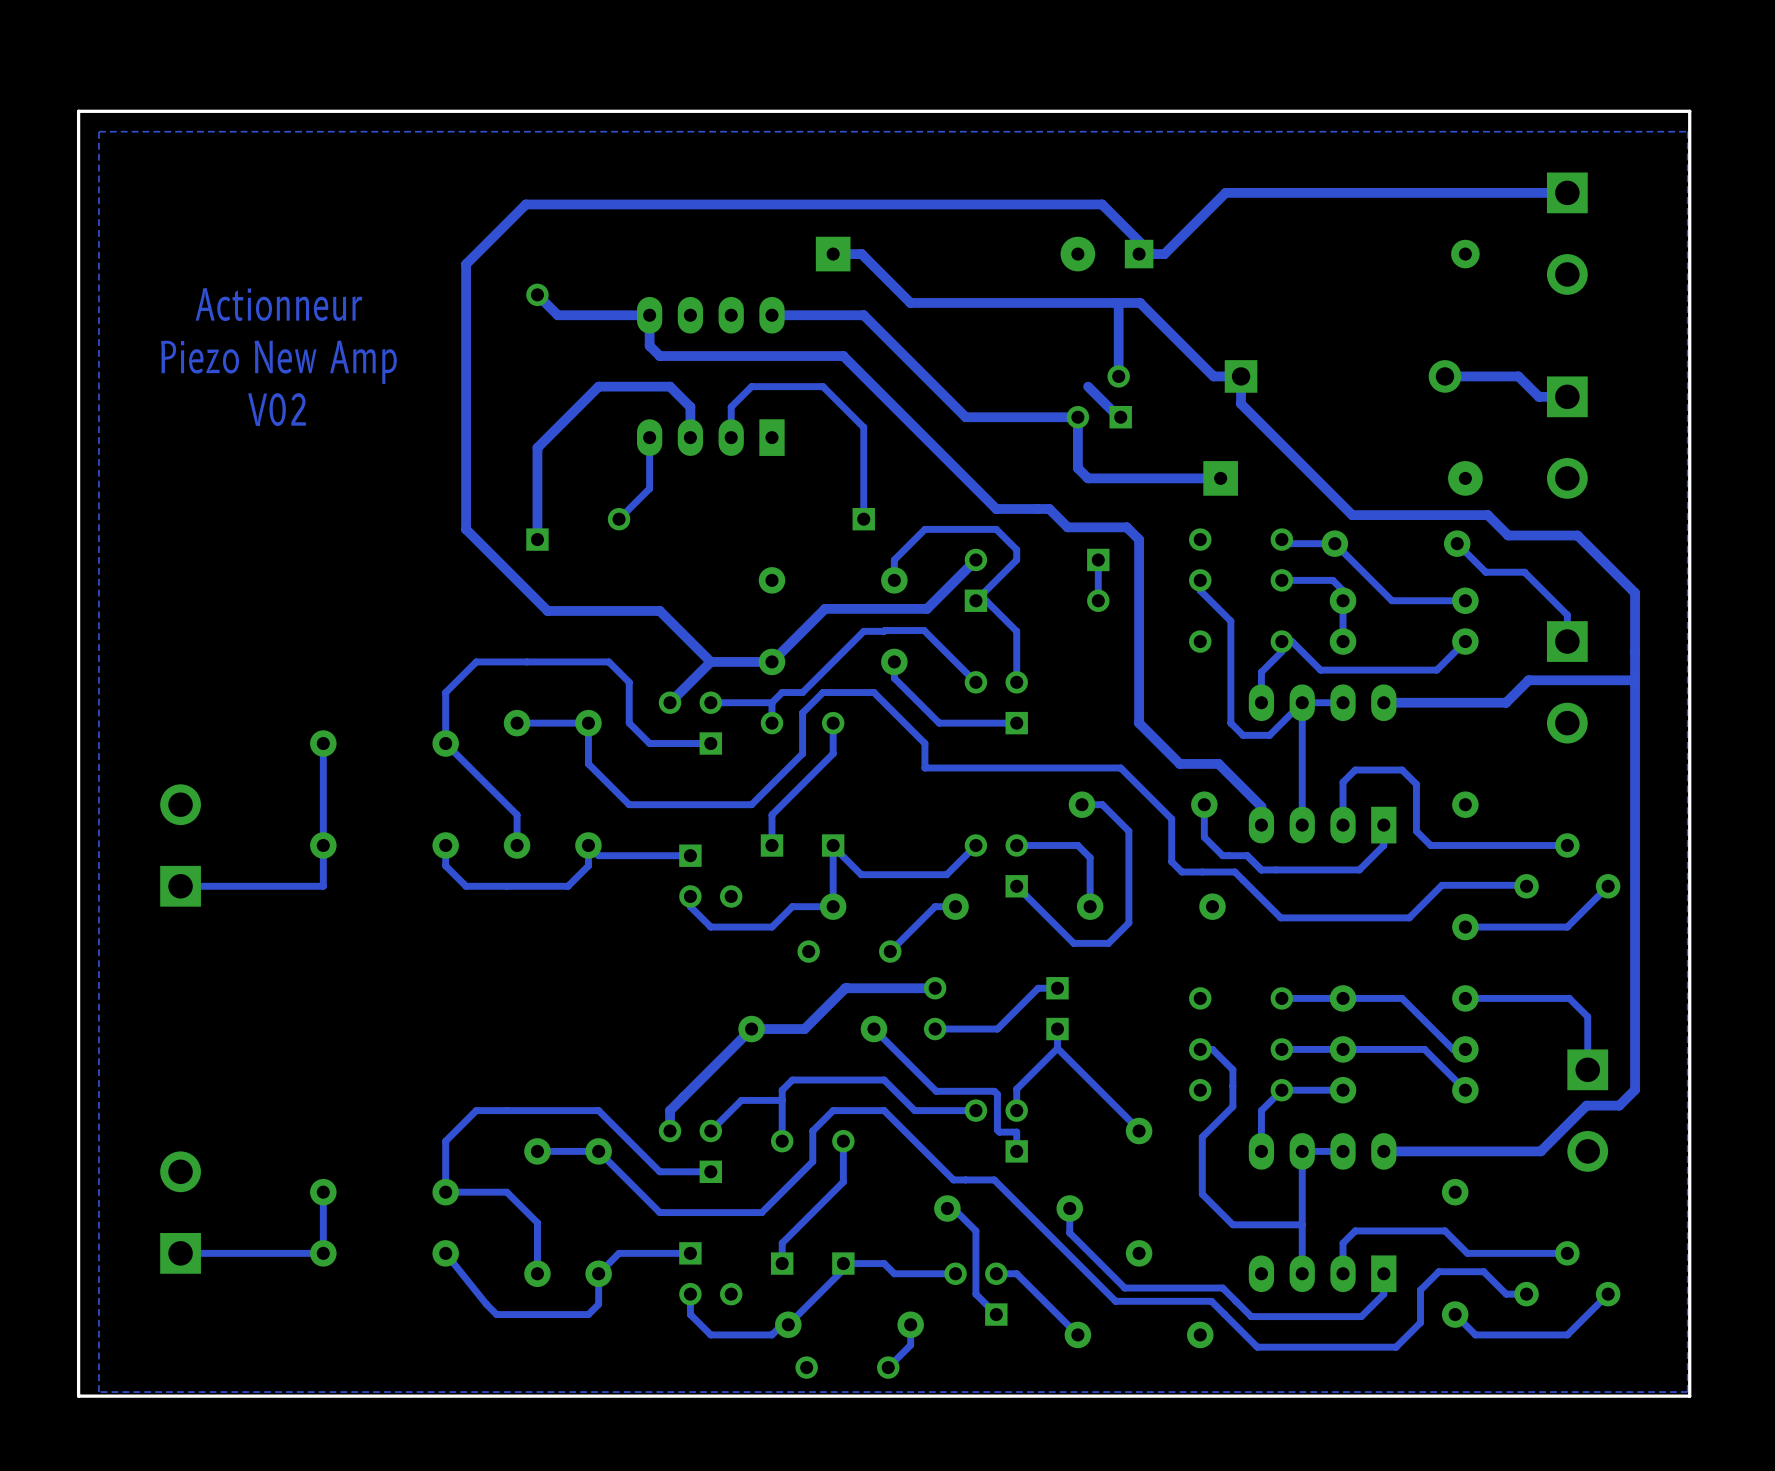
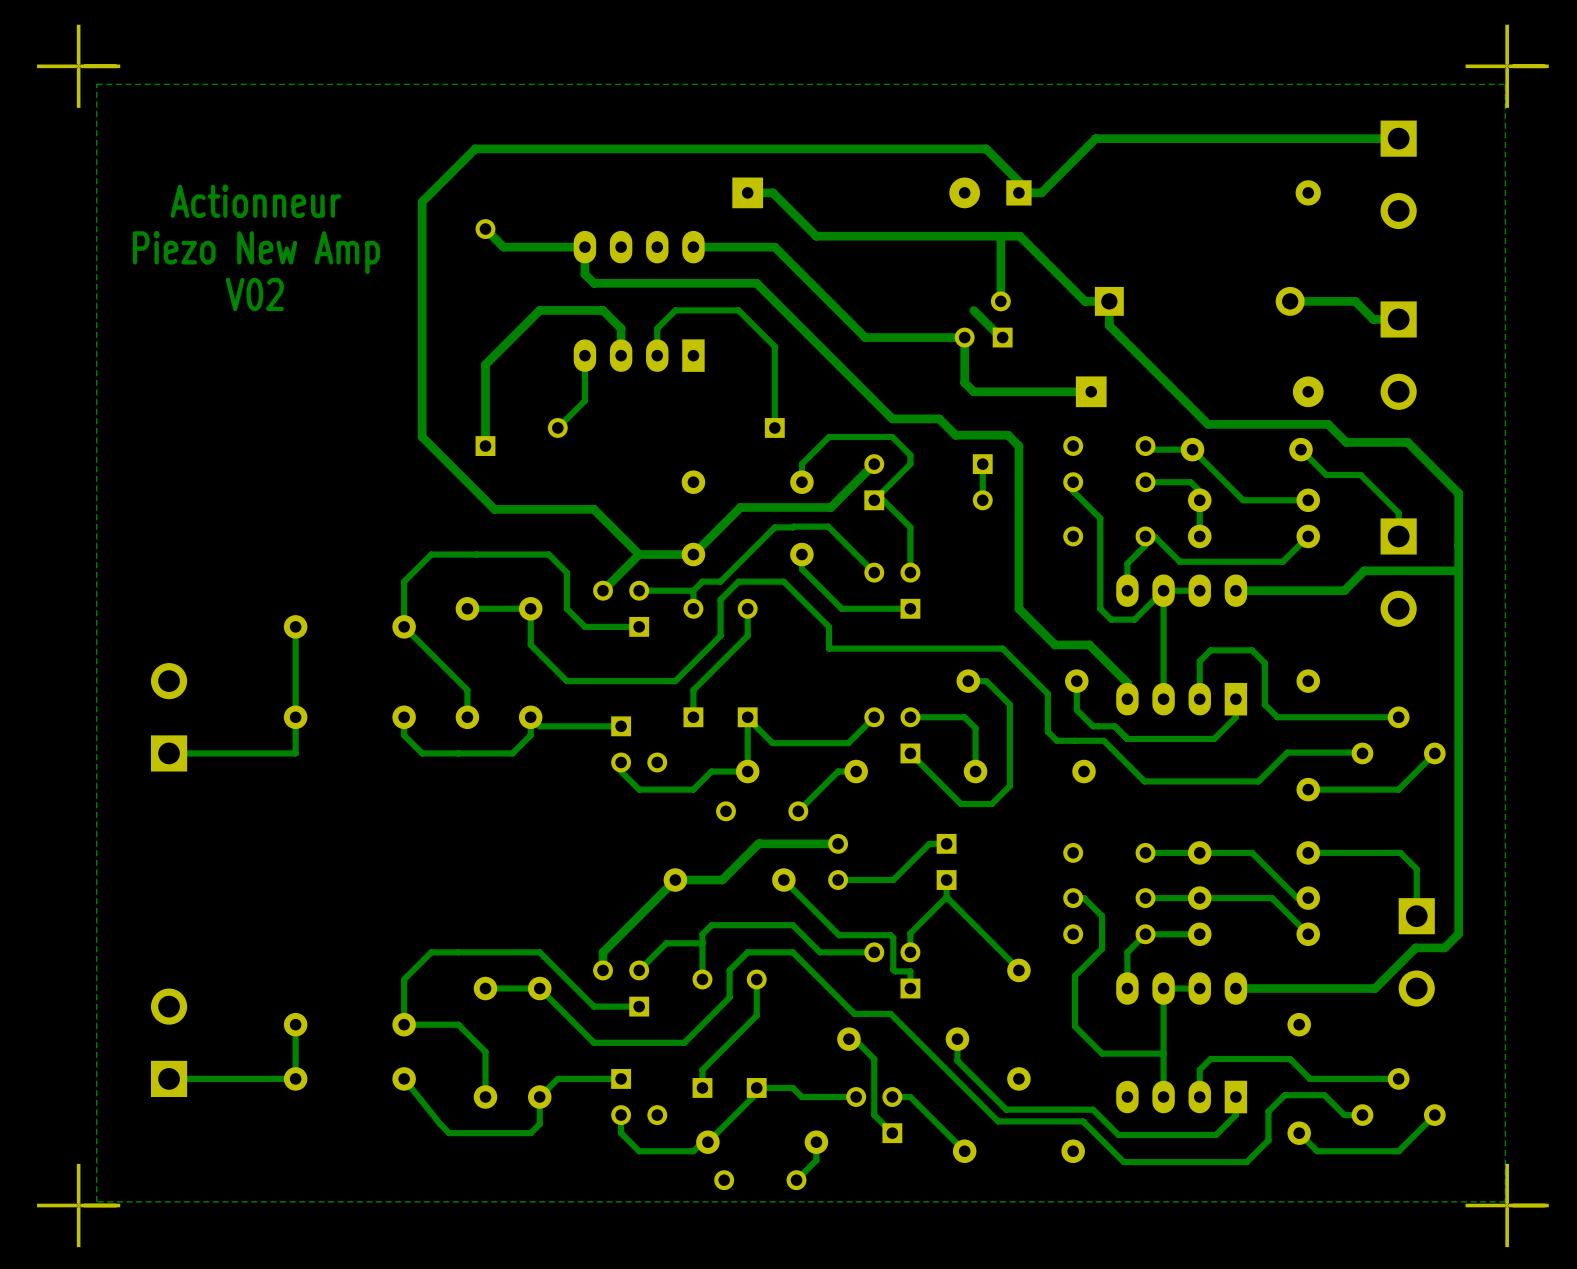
part: none -> (78, 66)
board edge: (1689, 111) (1689, 1396) (78, 1396) (78, 111) (1689, 111) -> none
part: none -> (1507, 66)
text: none -> Actionneur (255, 201)
text: Actionneur (278, 304) -> Piezo New Amp (256, 252)
text: Piezo New Amp (278, 362) -> V02 (254, 294)
text: V02 (277, 409) -> none
part: none -> (78, 1205)
part: none -> (1507, 1205)

